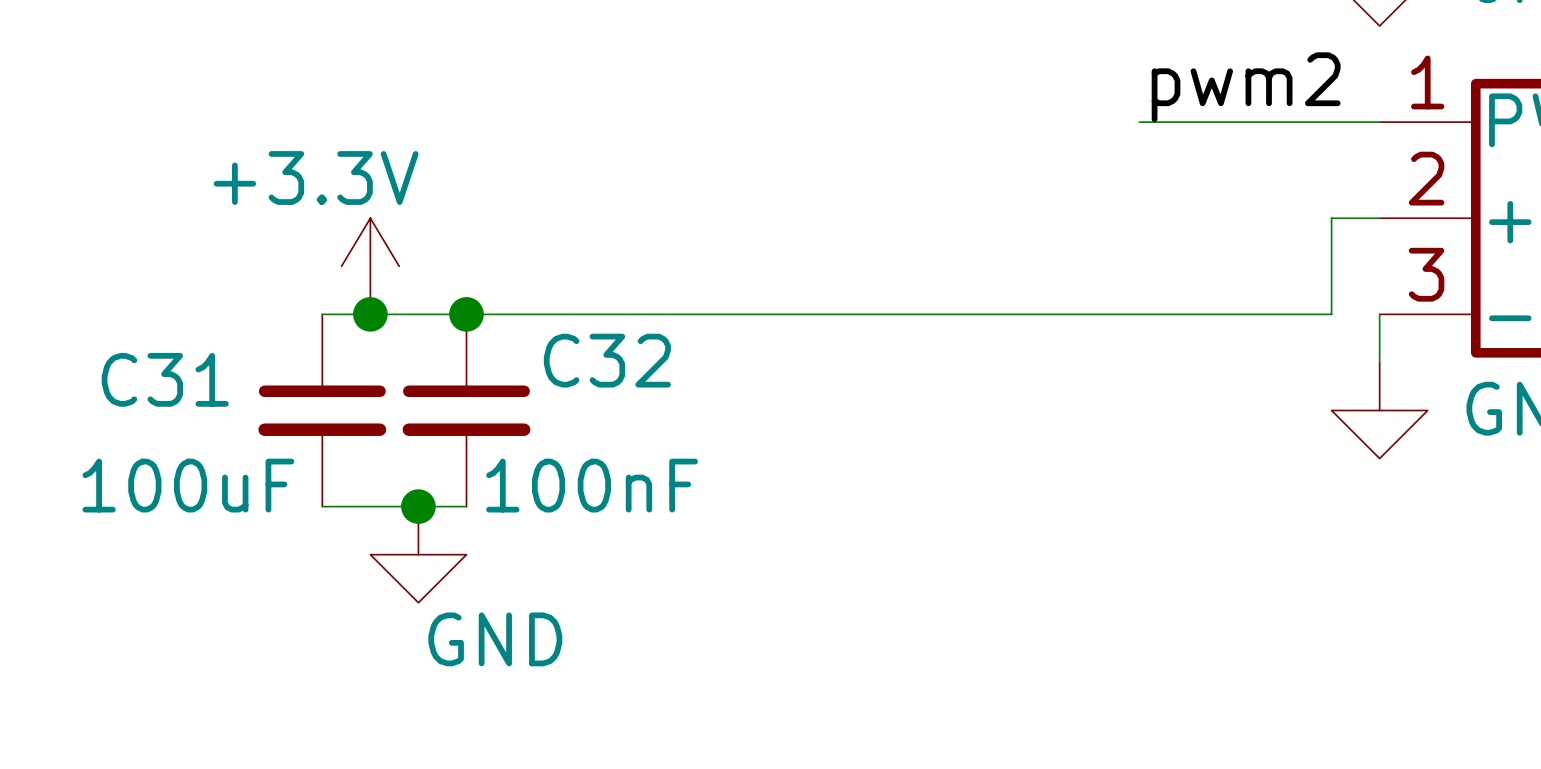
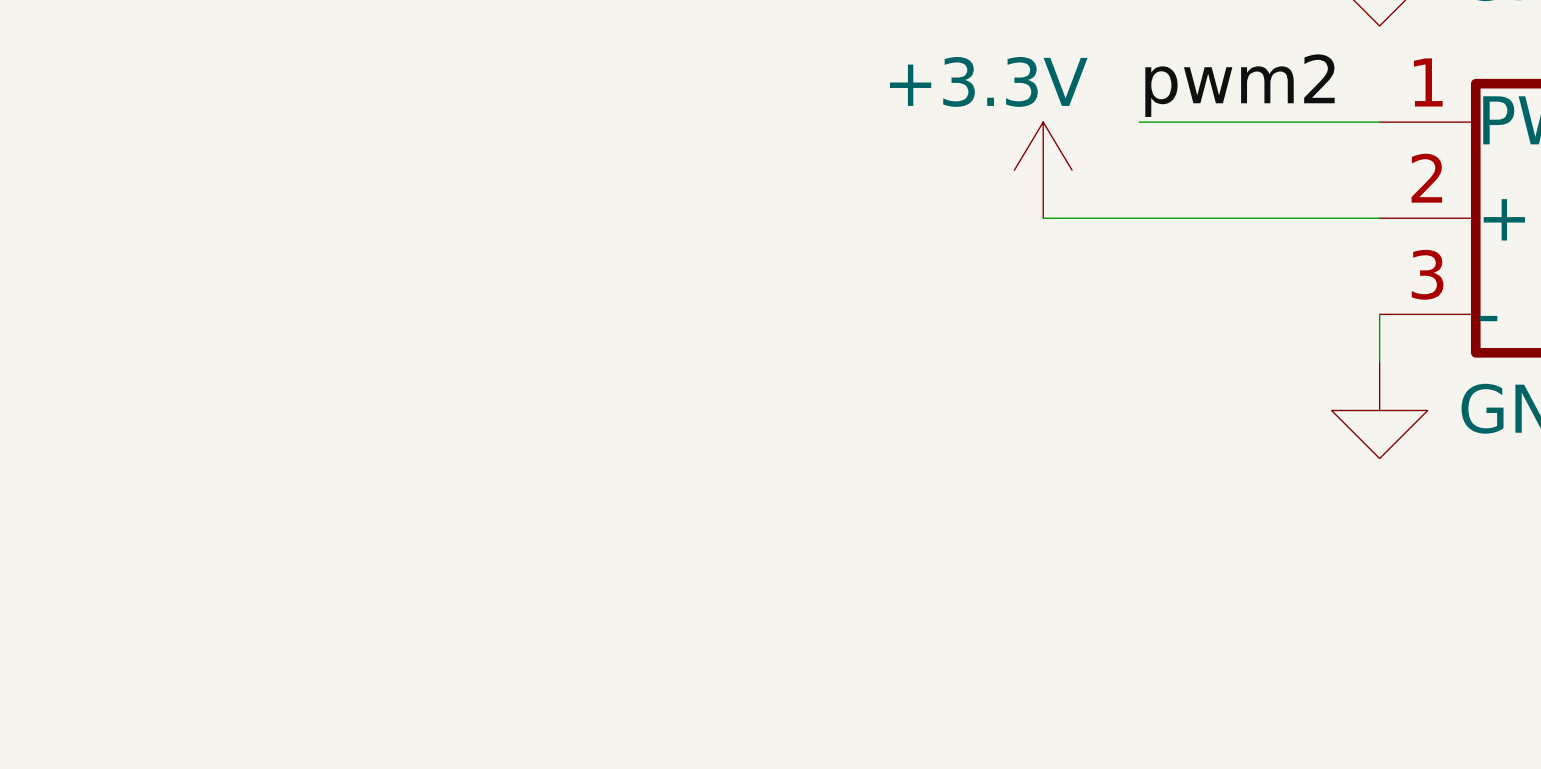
wire: (1331, 218) (1331, 314) (322, 314) -> (1331, 218) (1043, 218)
power symbol position: +3.3V (370, 266) -> +3.3V (1043, 170)
junction: (370, 314) -> none
junction: (466, 314) -> none
C31: 100uF (322, 410) -> none
C32: 100nF (466, 410) -> none
wire: (322, 506) (466, 506) -> none
junction: (418, 506) -> none
power symbol: GND (418, 554) -> none

